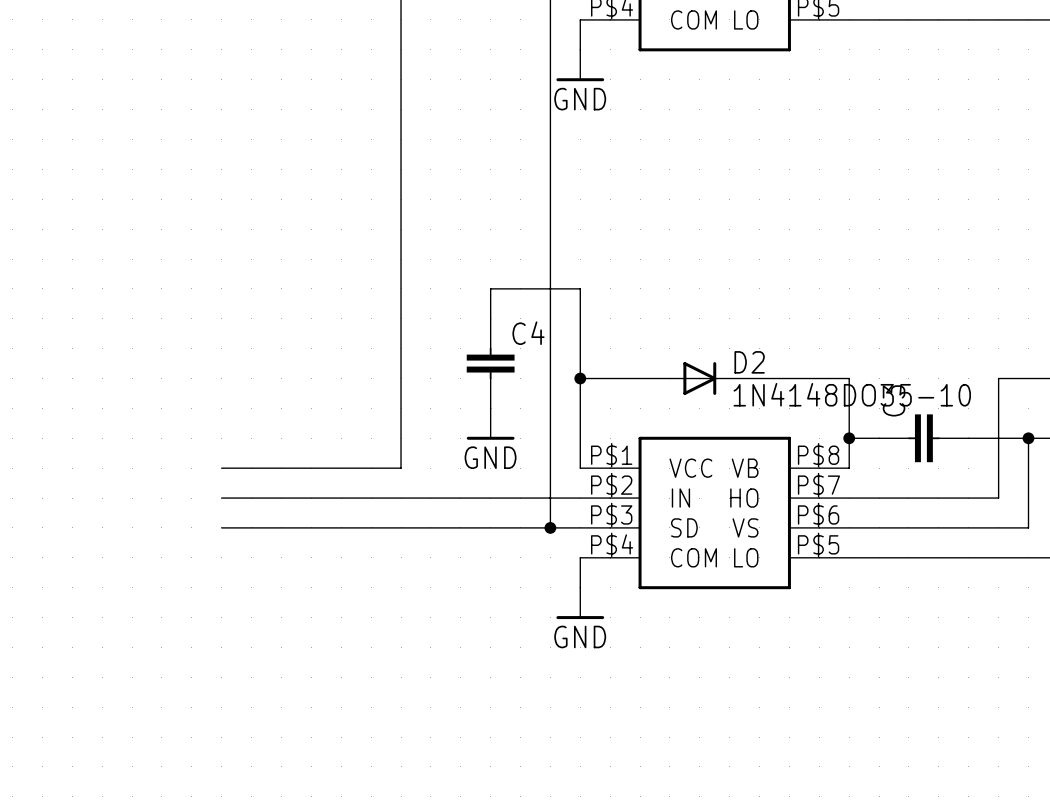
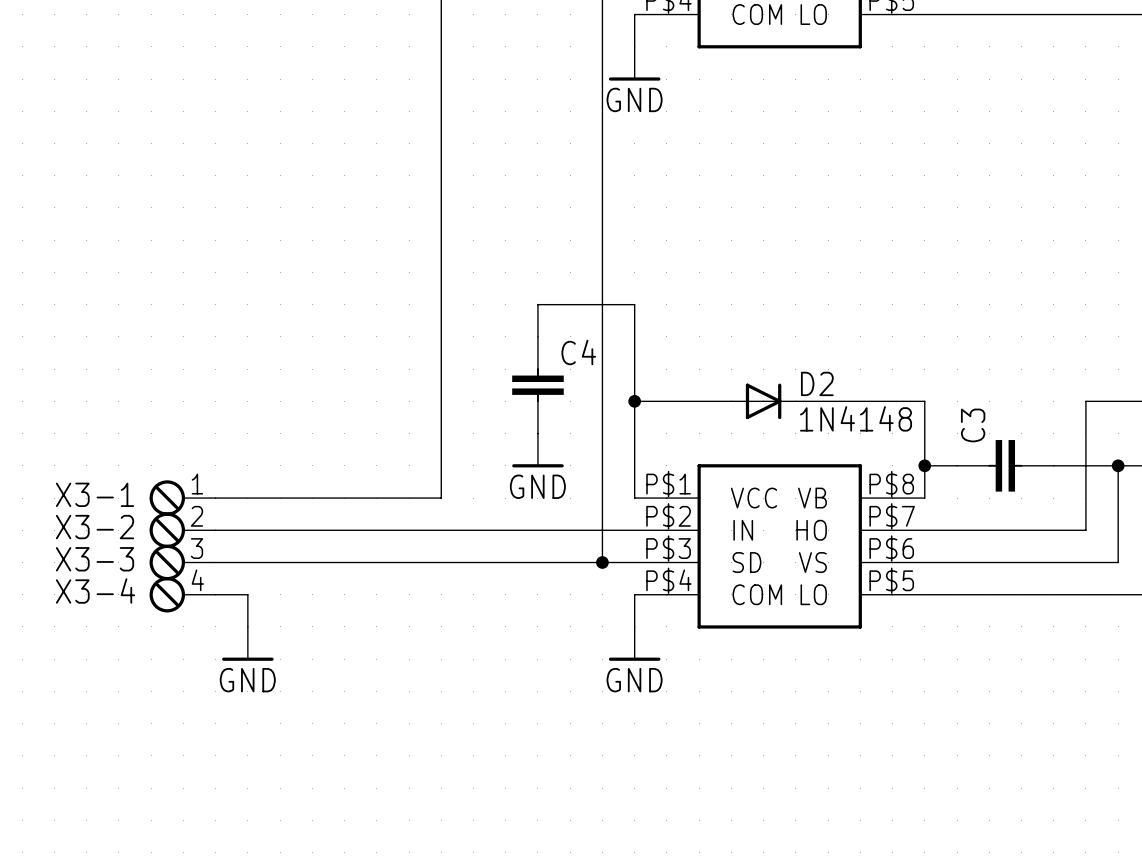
D2 value: 1N4148DO35-10 (852, 394) -> 1N4148 (856, 418)
X3-1: none -> (182, 498)
wire: none -> (215, 498) (247, 498)
X3-2: none -> (182, 530)
wire: none -> (215, 530) (247, 530)
X3-3: none -> (182, 562)
wire: none -> (215, 562) (247, 562)
X3-4: none -> (182, 594)
wire: none -> (215, 594) (247, 594) (247, 626)
power symbol: none -> GND (247, 643)

